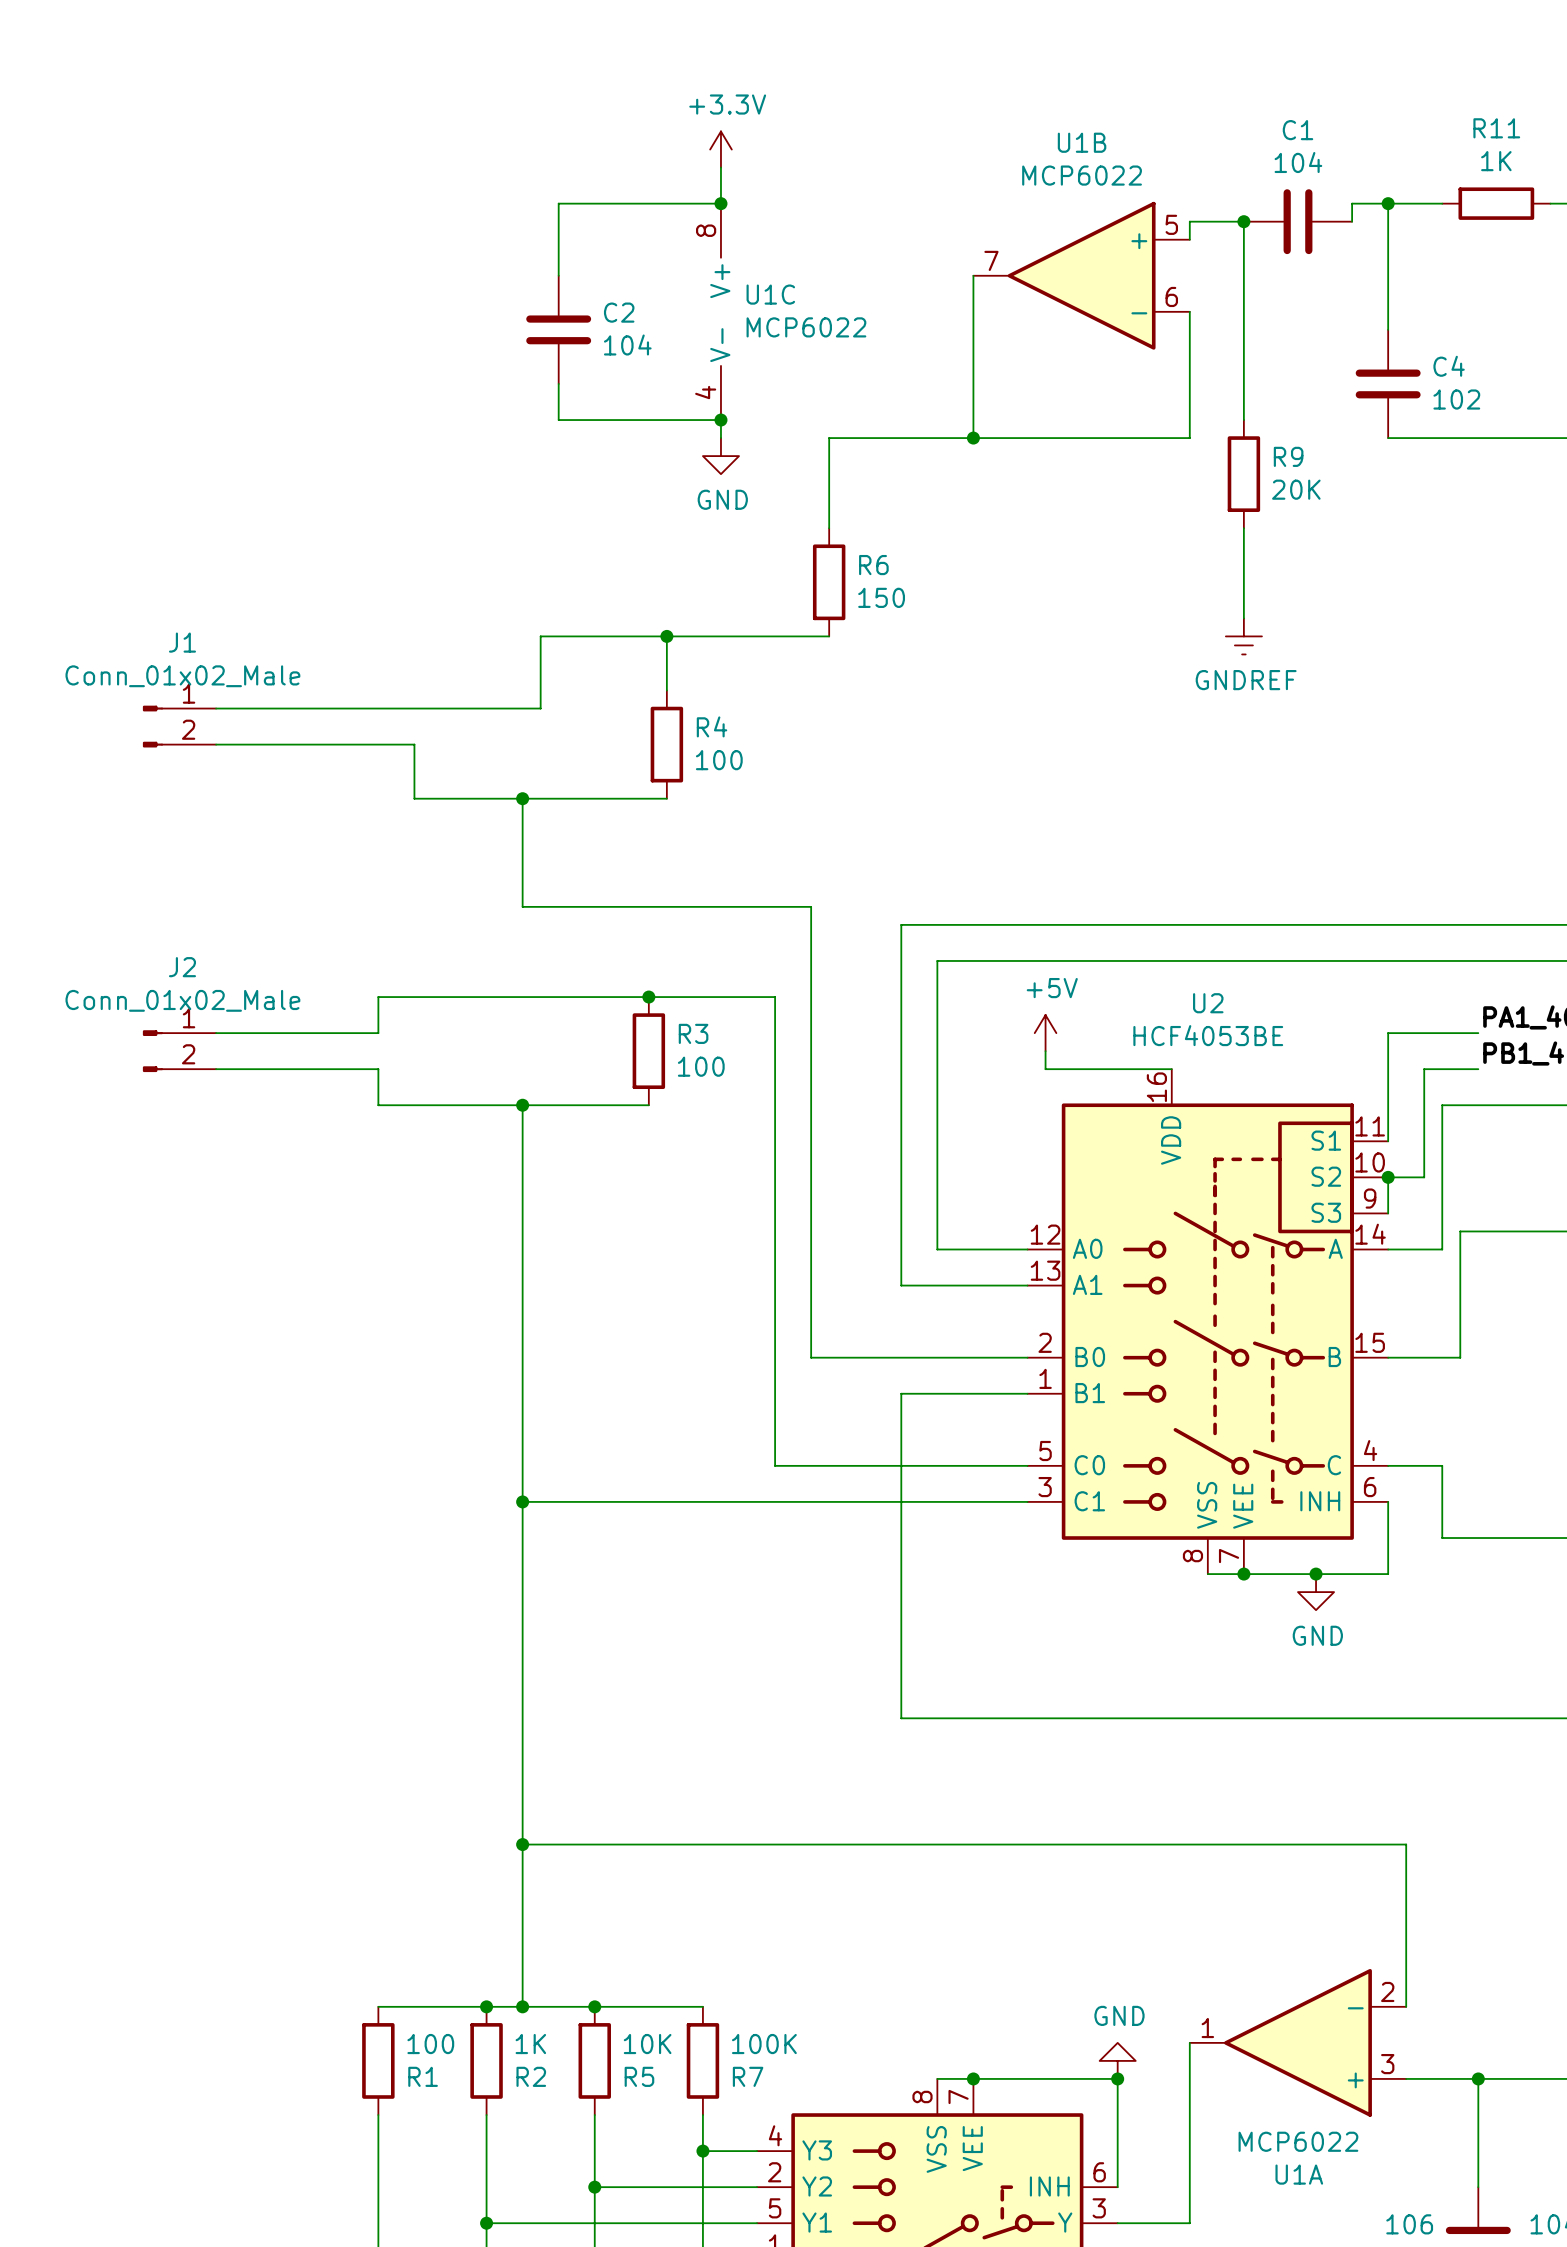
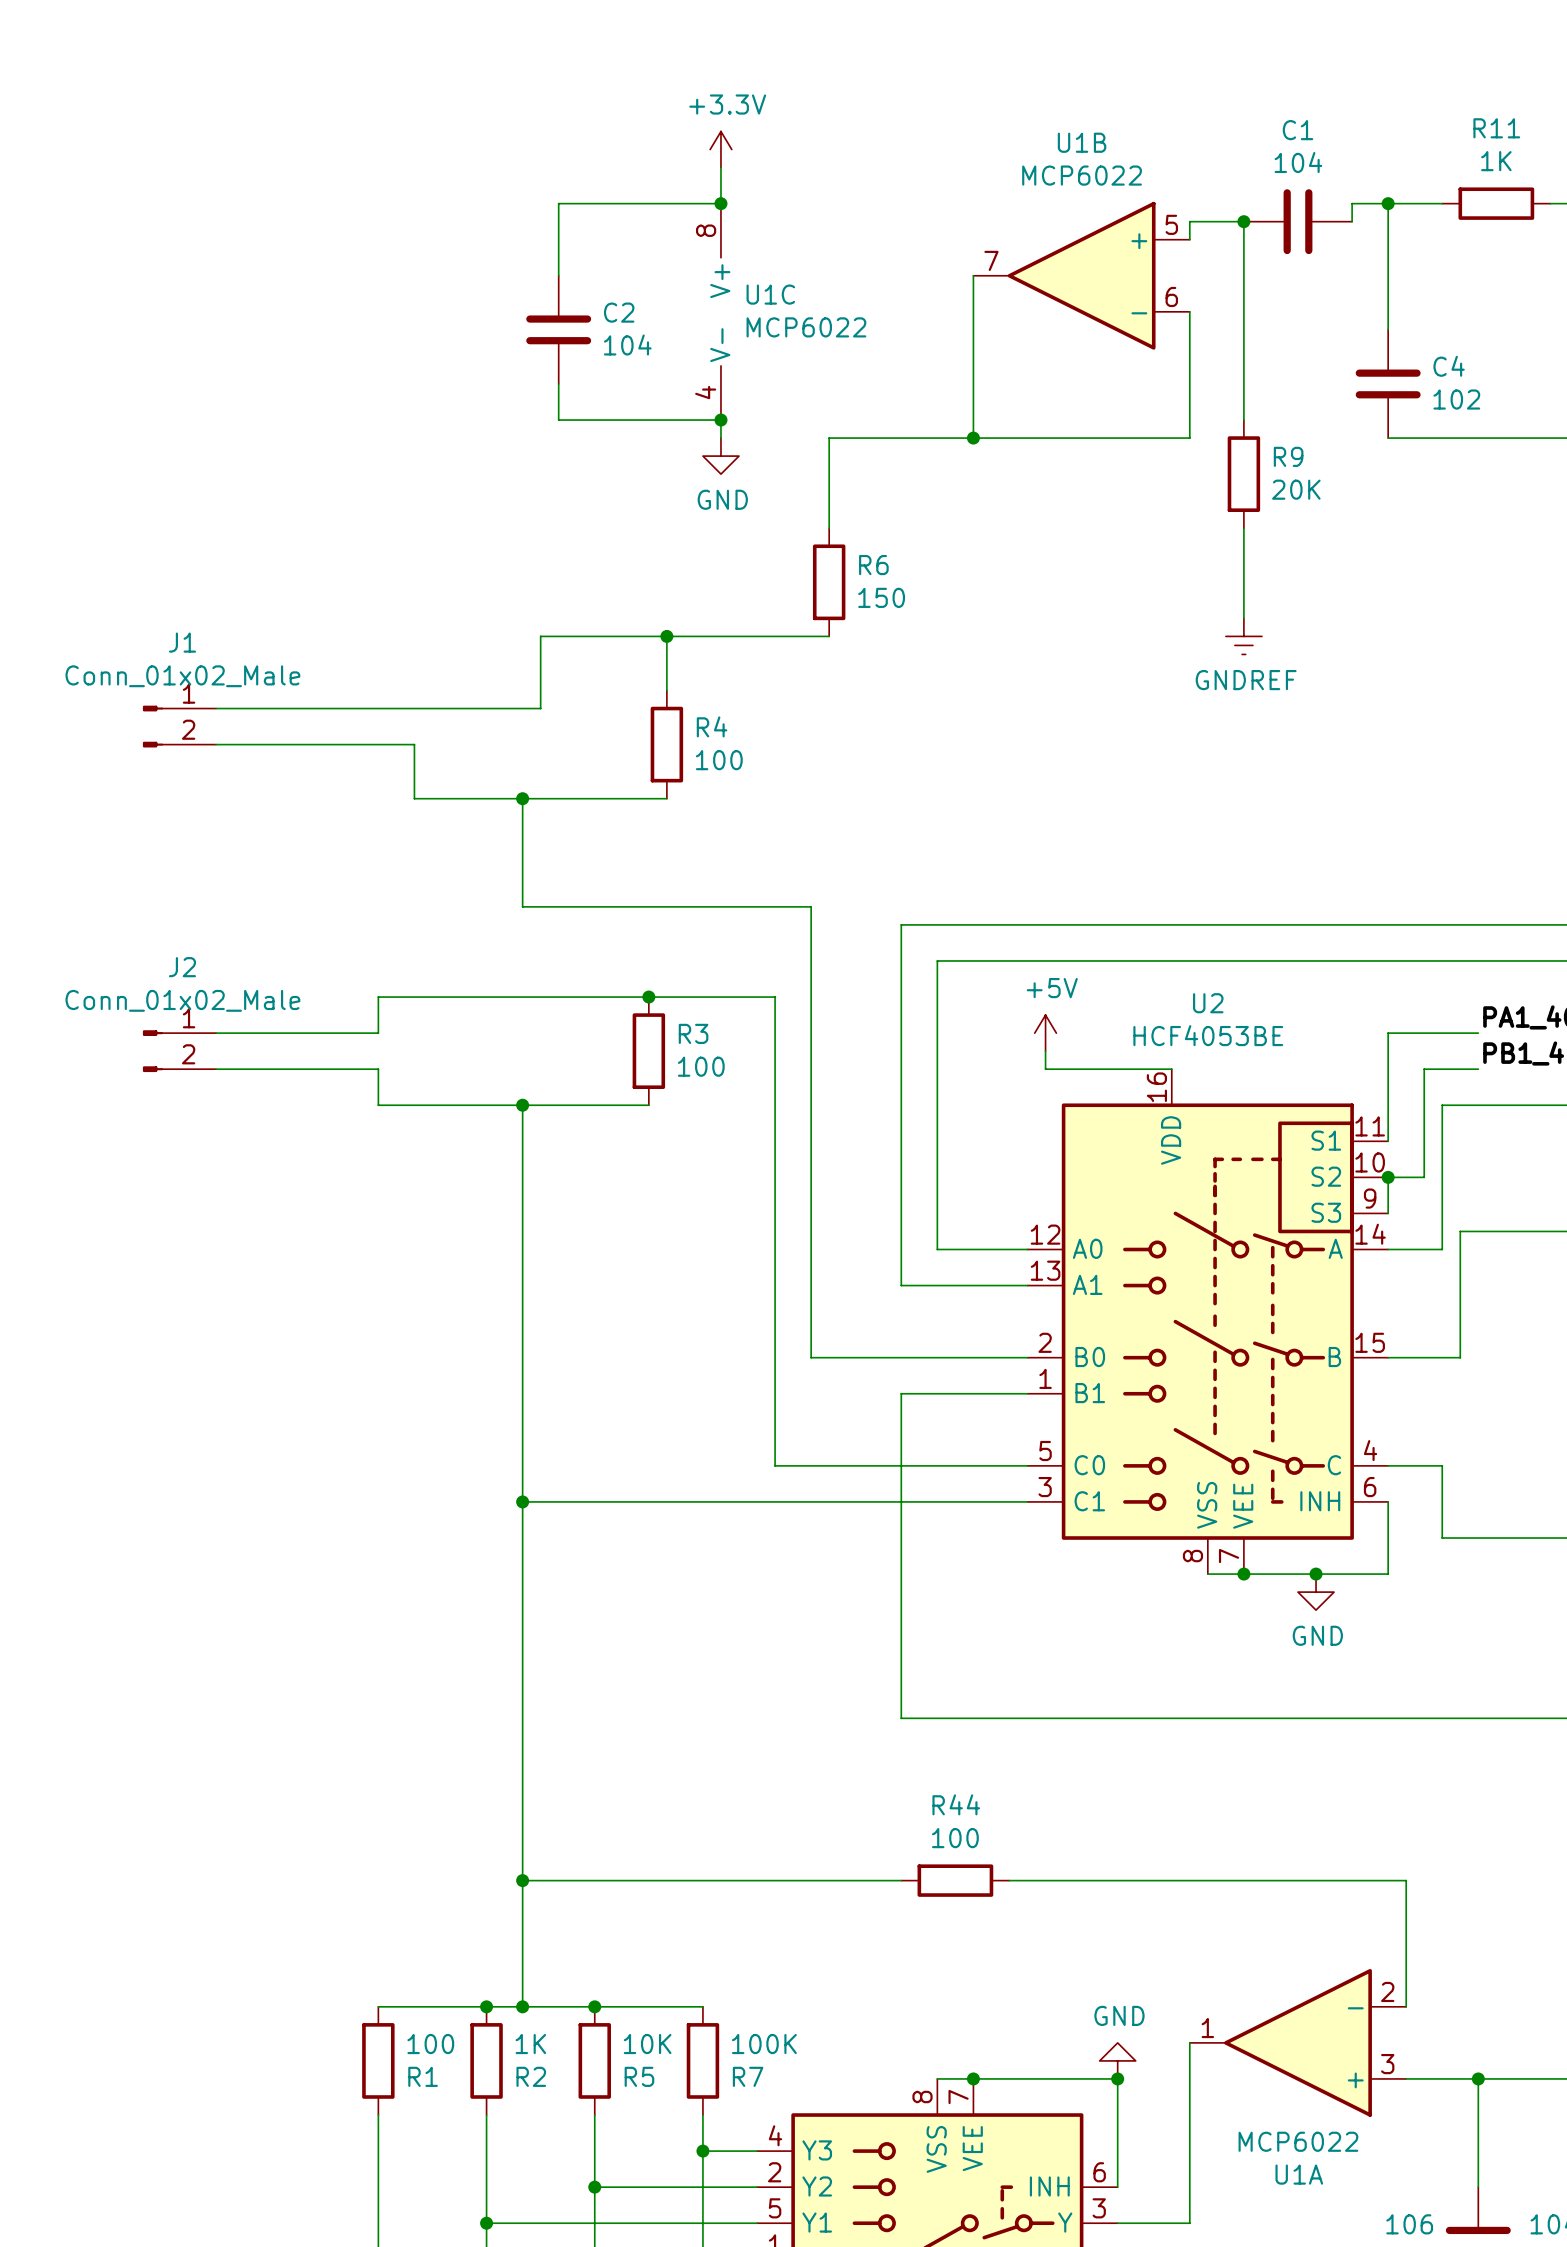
wire: (522, 1844) (1406, 1844) (1406, 1880) -> (1009, 1880) (1406, 1880)
junction position: (522, 1844) -> (522, 1880)
wire: none -> (522, 1880) (901, 1880)
R44: none -> 100 (955, 1880)

